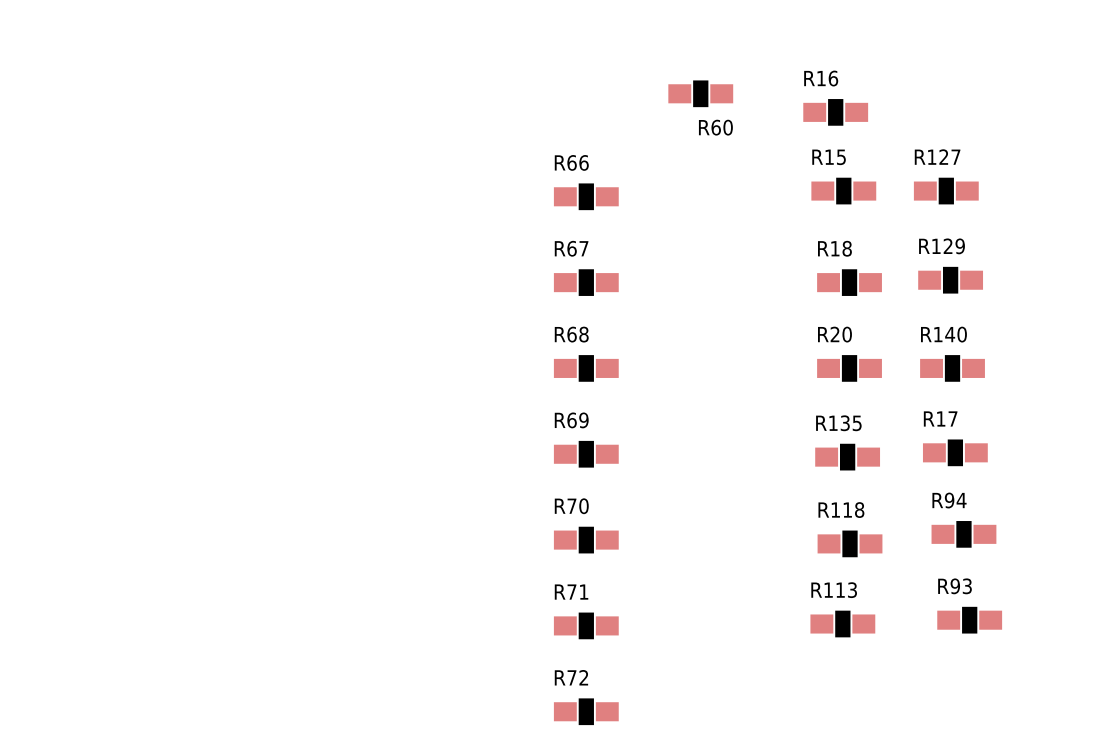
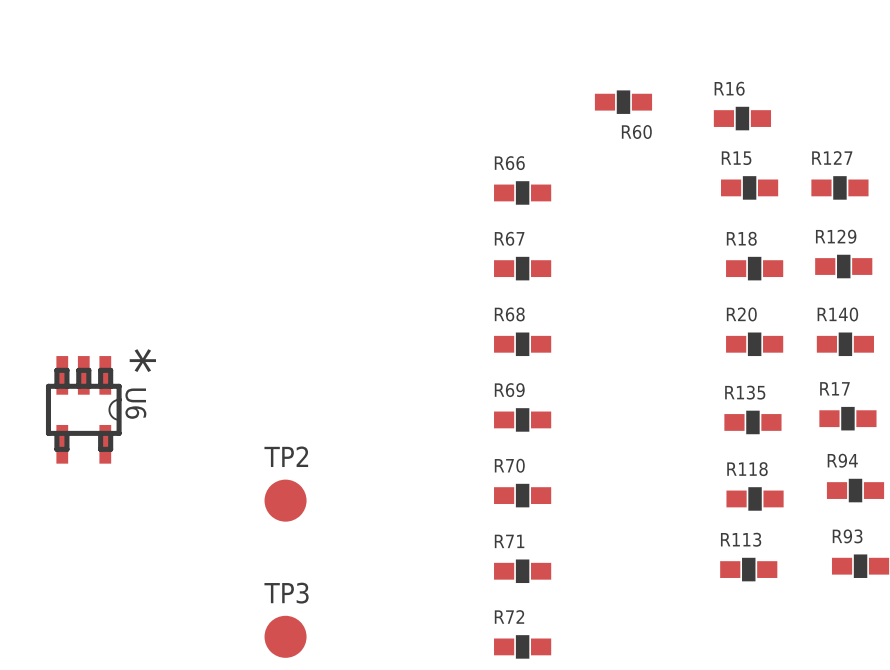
U6: none -> (83, 409)
TP2: none -> (285, 500)
TP3: none -> (285, 636)

